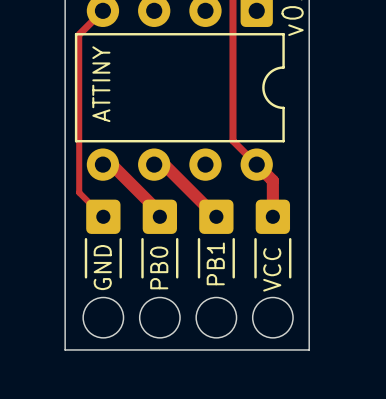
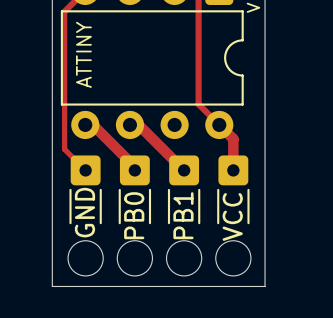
text: PB1 (215, 263) -> none
GND name: none -> GND (84, 212)
text: GND (102, 267) -> none
text: PB0 (159, 267) -> none
PB0 name: none -> PB0 (134, 215)
PB1 name: none -> PB1 (183, 215)
text: VCC (272, 269) -> none
VCC name: none -> VCC (232, 216)

